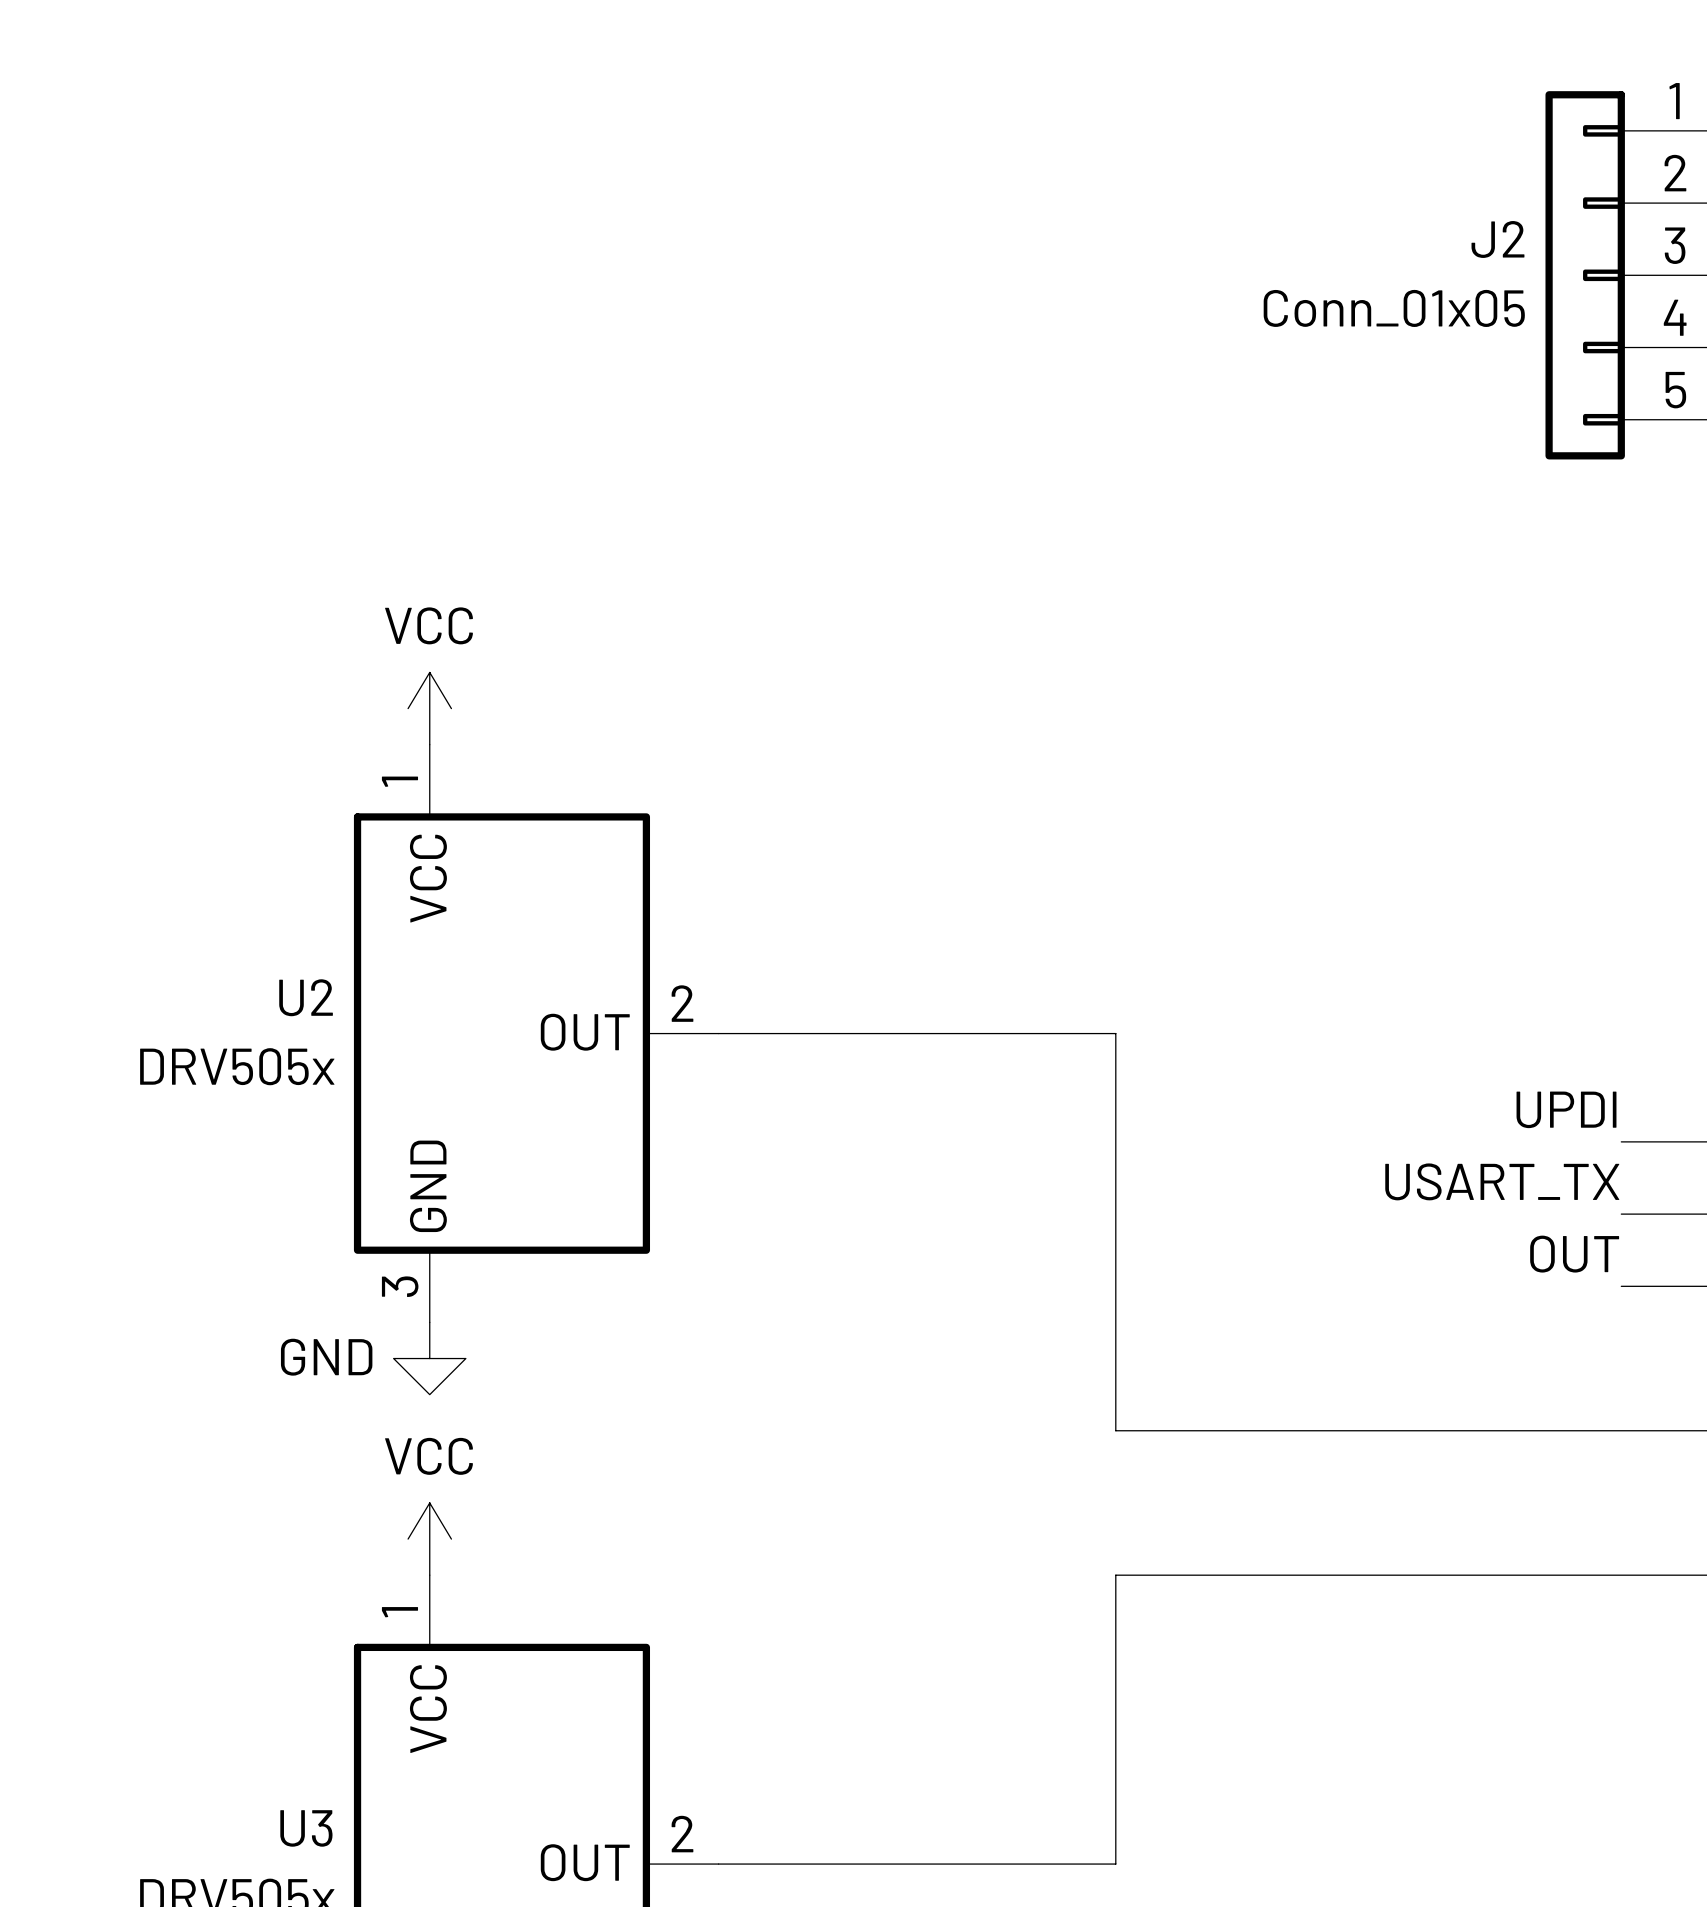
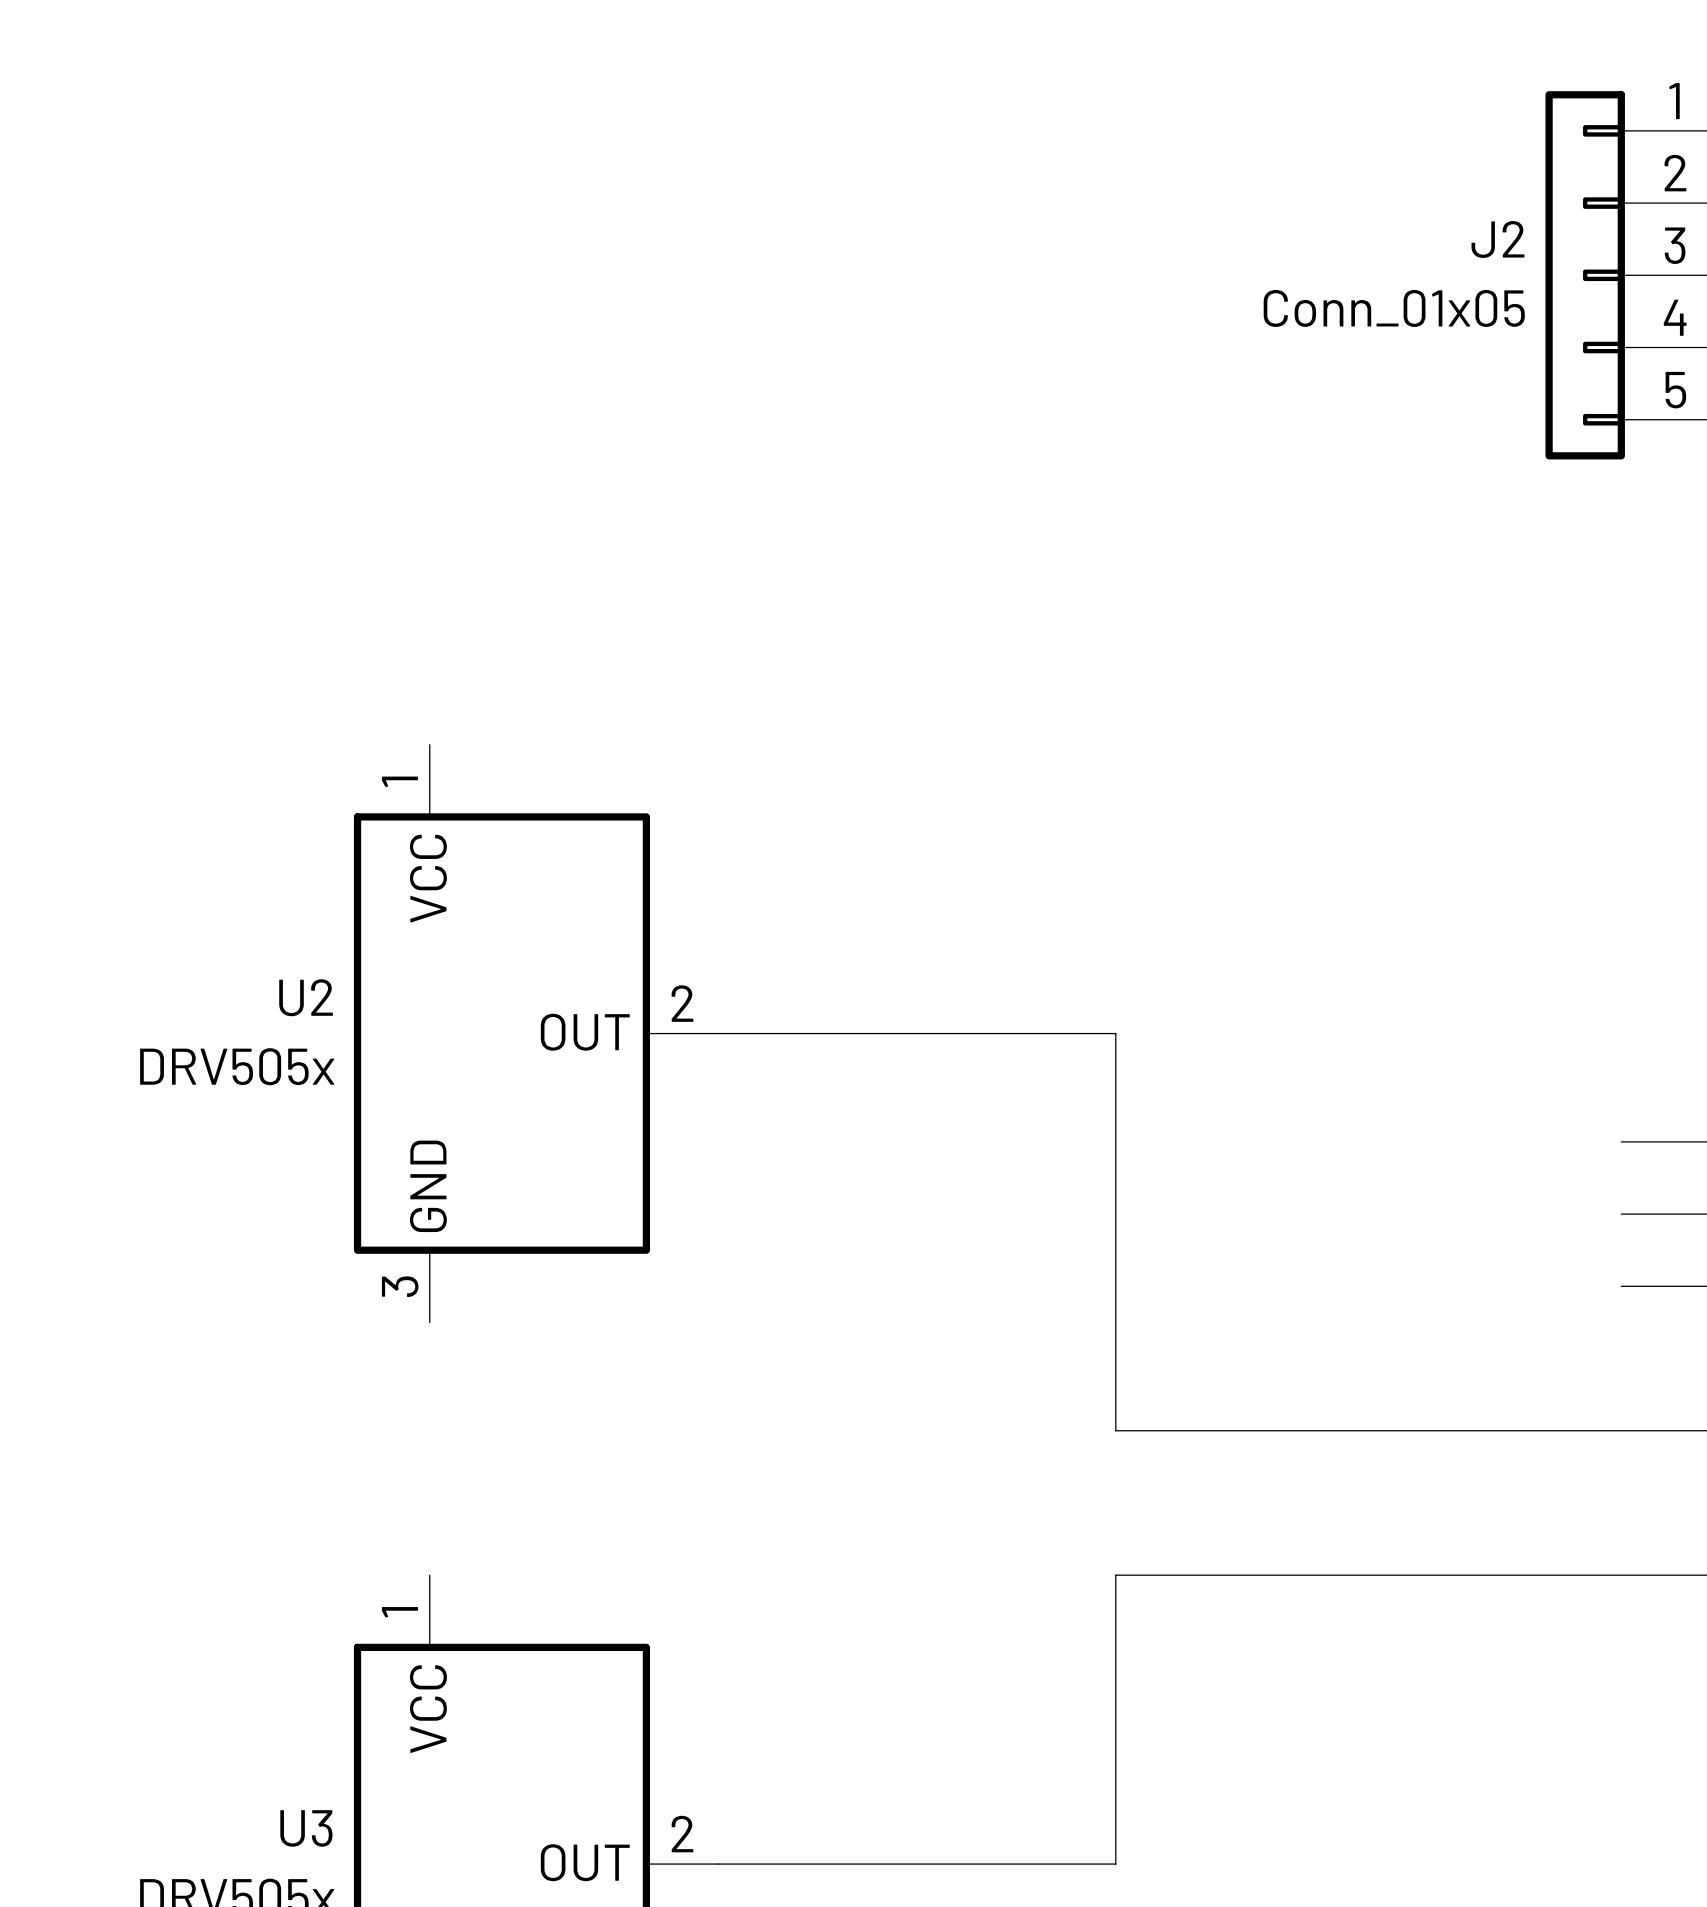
power symbol: VCC (429, 708) -> none
label: UPDI (1566, 1109) -> none
label: USART_TX (1502, 1181) -> none
label: OUT (1574, 1254) -> none
power symbol: GND (429, 1358) -> none
power symbol: VCC (429, 1539) -> none

